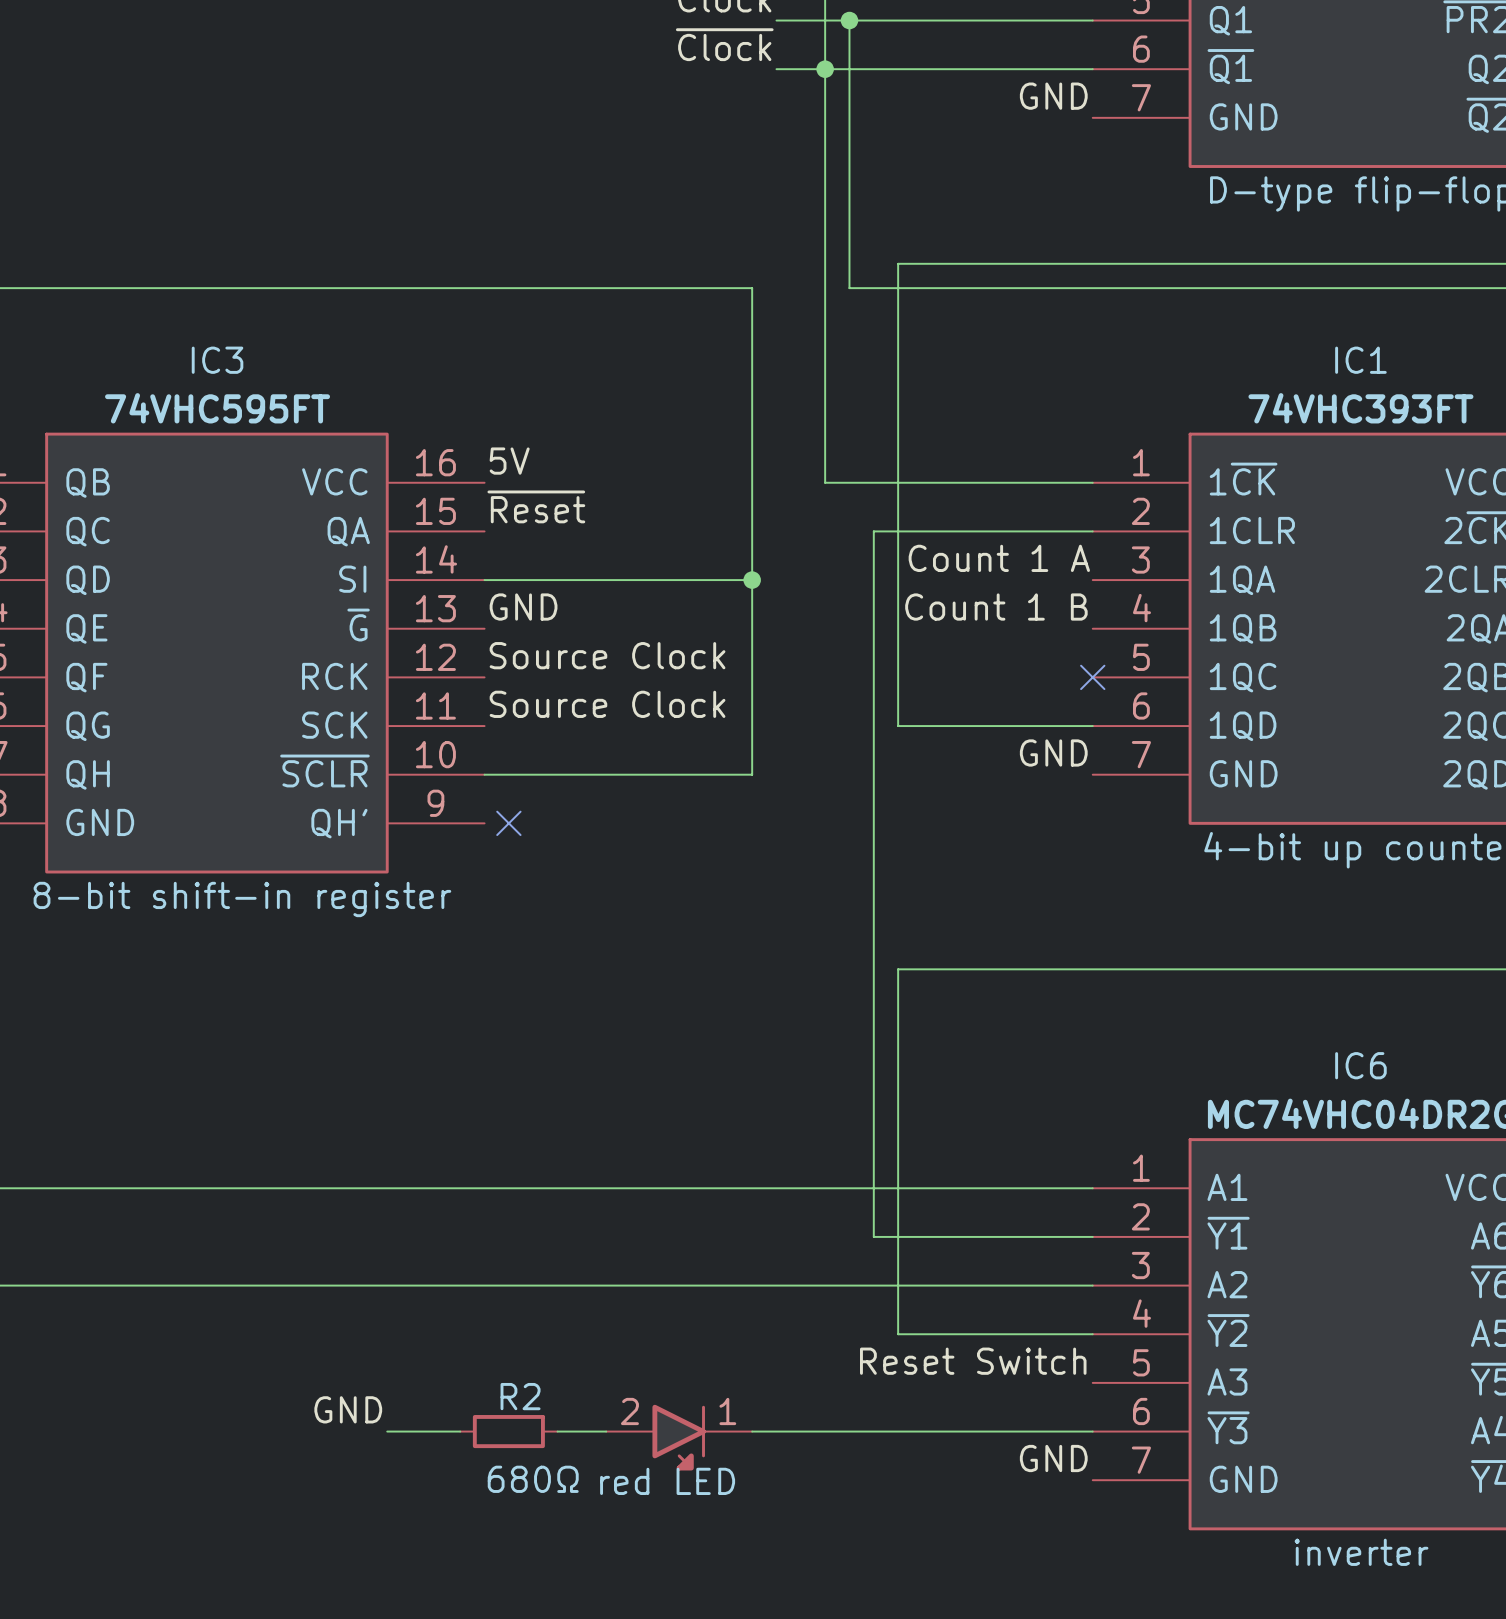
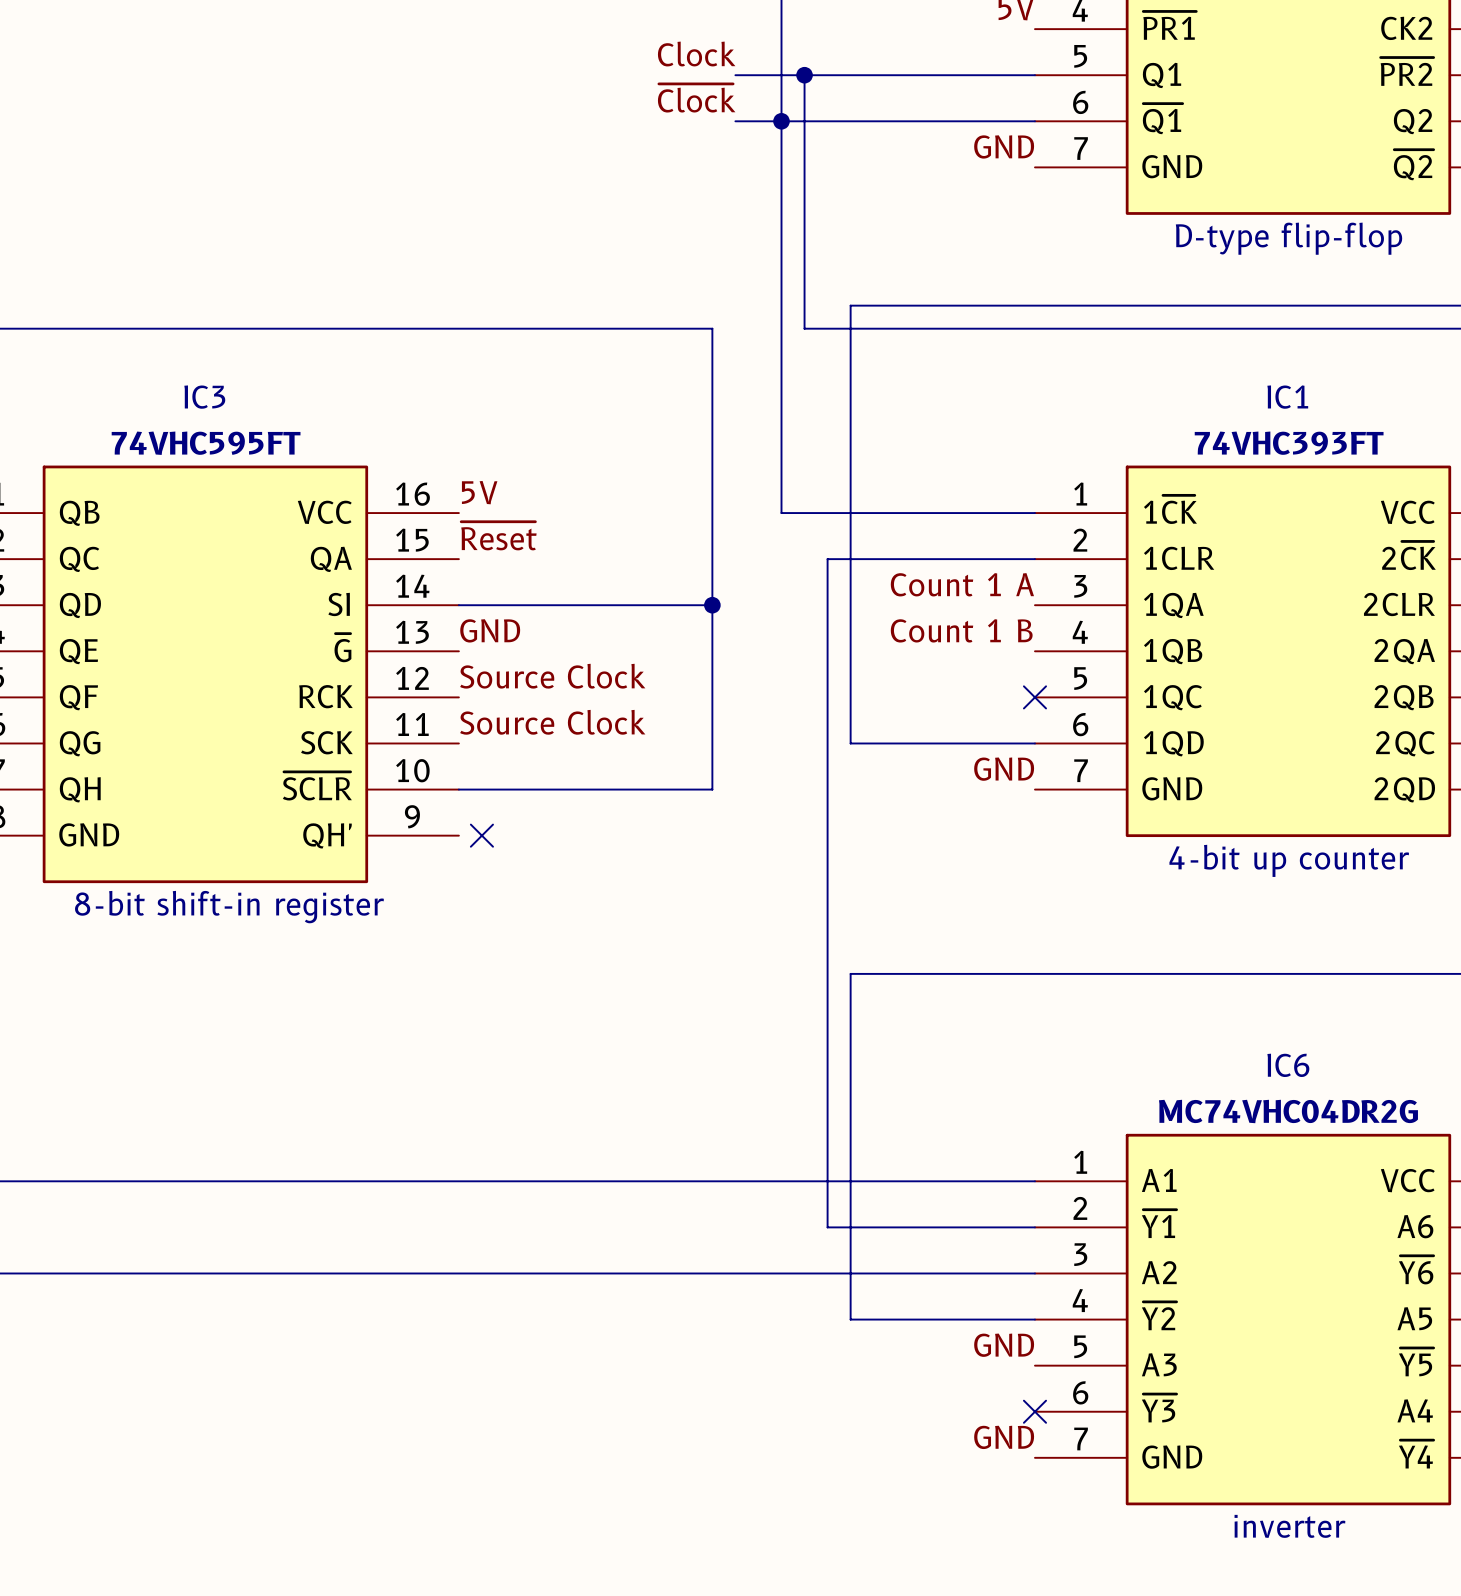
label: Reset Switch (973, 1361) -> GND (1004, 1345)
label: GND (348, 1409) -> none
wire: (387, 1431) (460, 1431) -> none
R2: (508, 1431) -> none
wire: (557, 1431) (606, 1431) -> none
wire: (752, 1431) (1092, 1431) -> none
no-connect mark: none -> (1034, 1411)
part: (679, 1437) -> none

